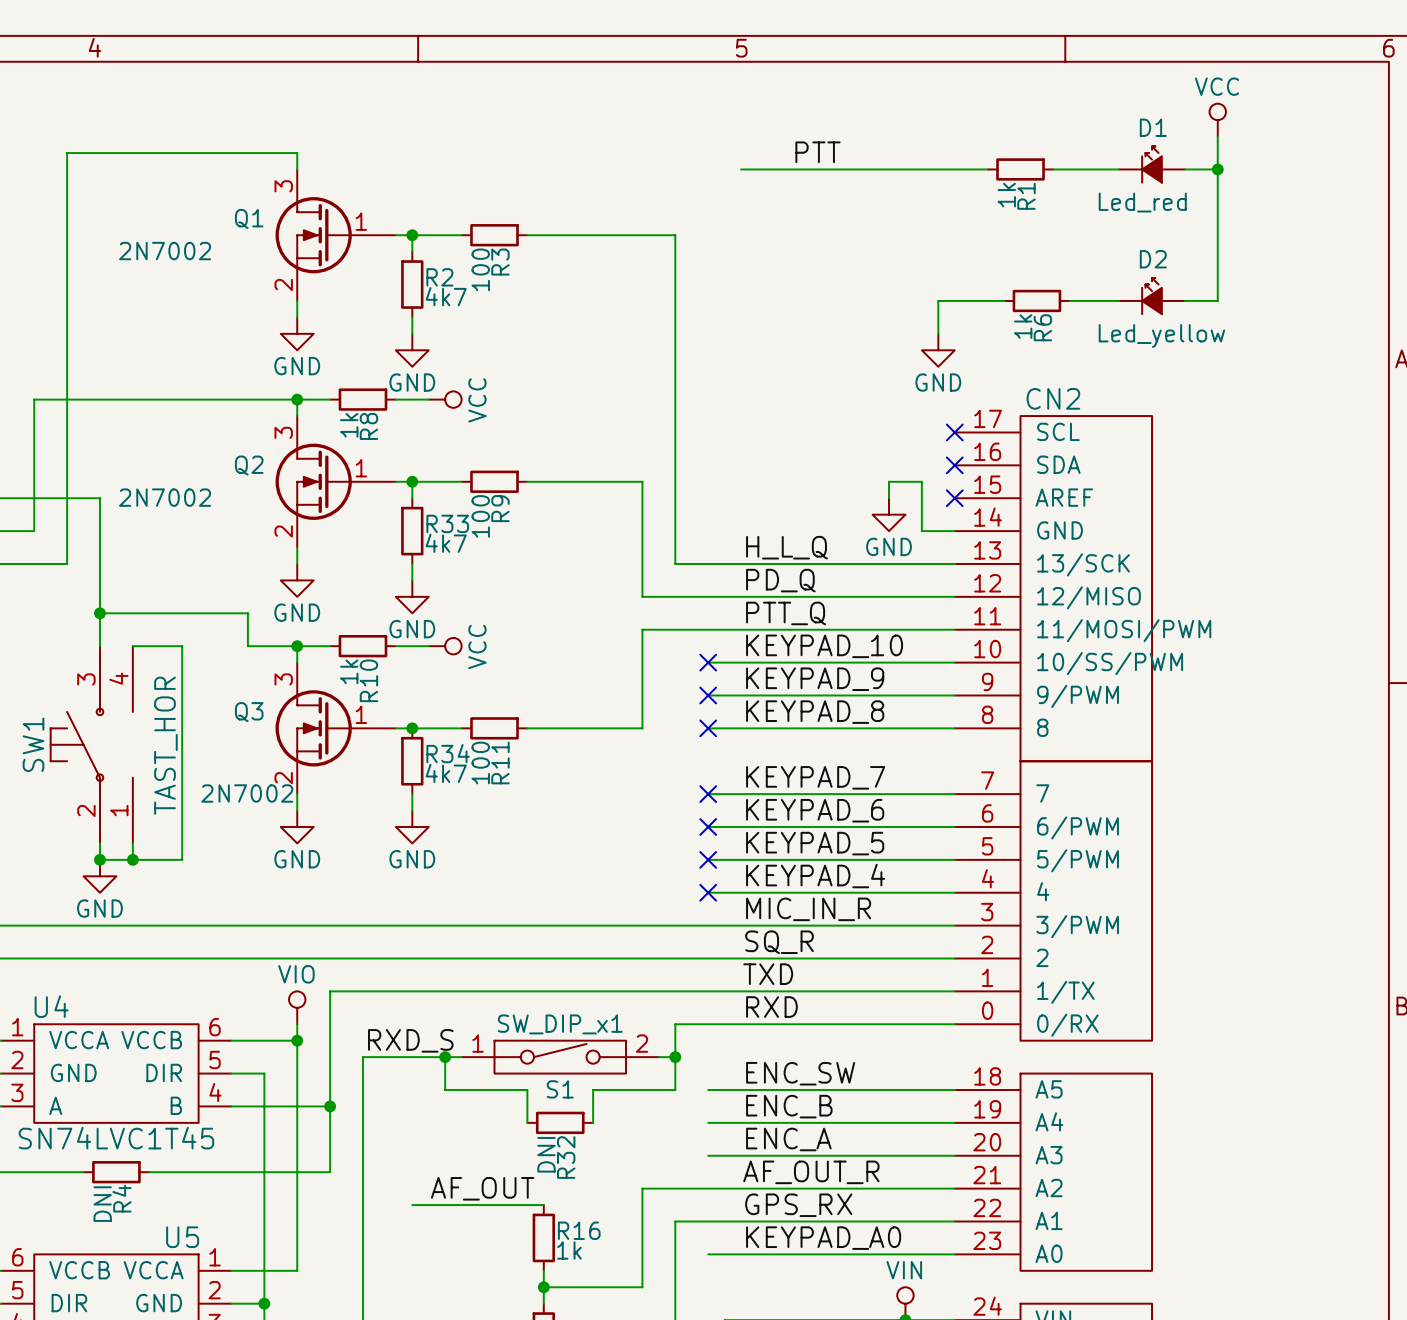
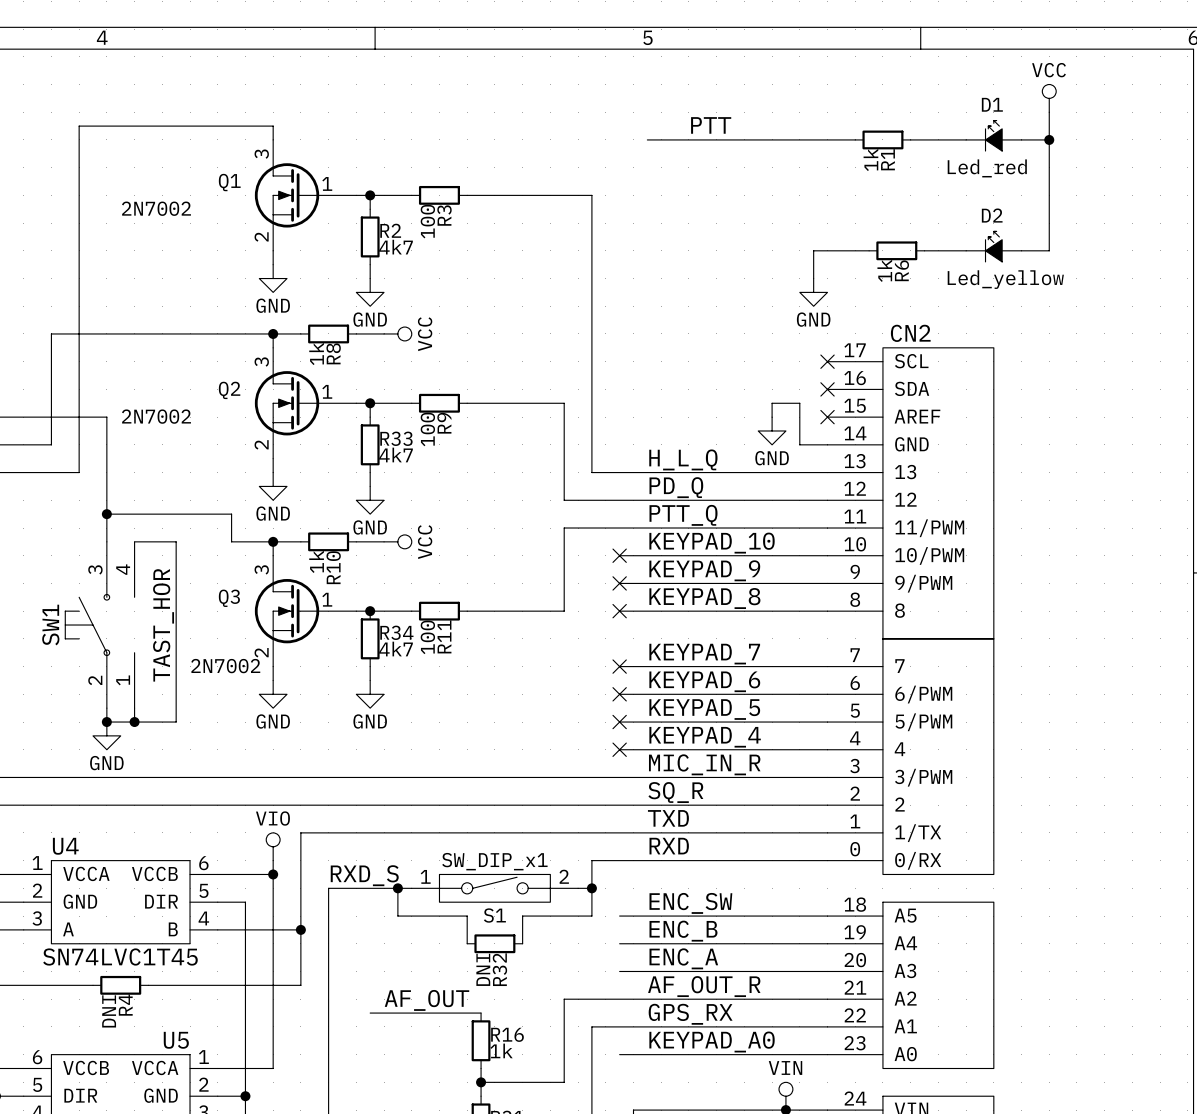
CN2 pin name: 13/SCK (1083, 564) -> 13 (905, 472)
CN2 pin name: 12/MISO (1088, 597) -> 12 (905, 499)
CN2 pin name: 11/MOSI/PWM (1124, 630) -> 11/PWM (929, 528)
CN2 pin name: 10/SS/PWM (1110, 663) -> 10/PWM (929, 555)

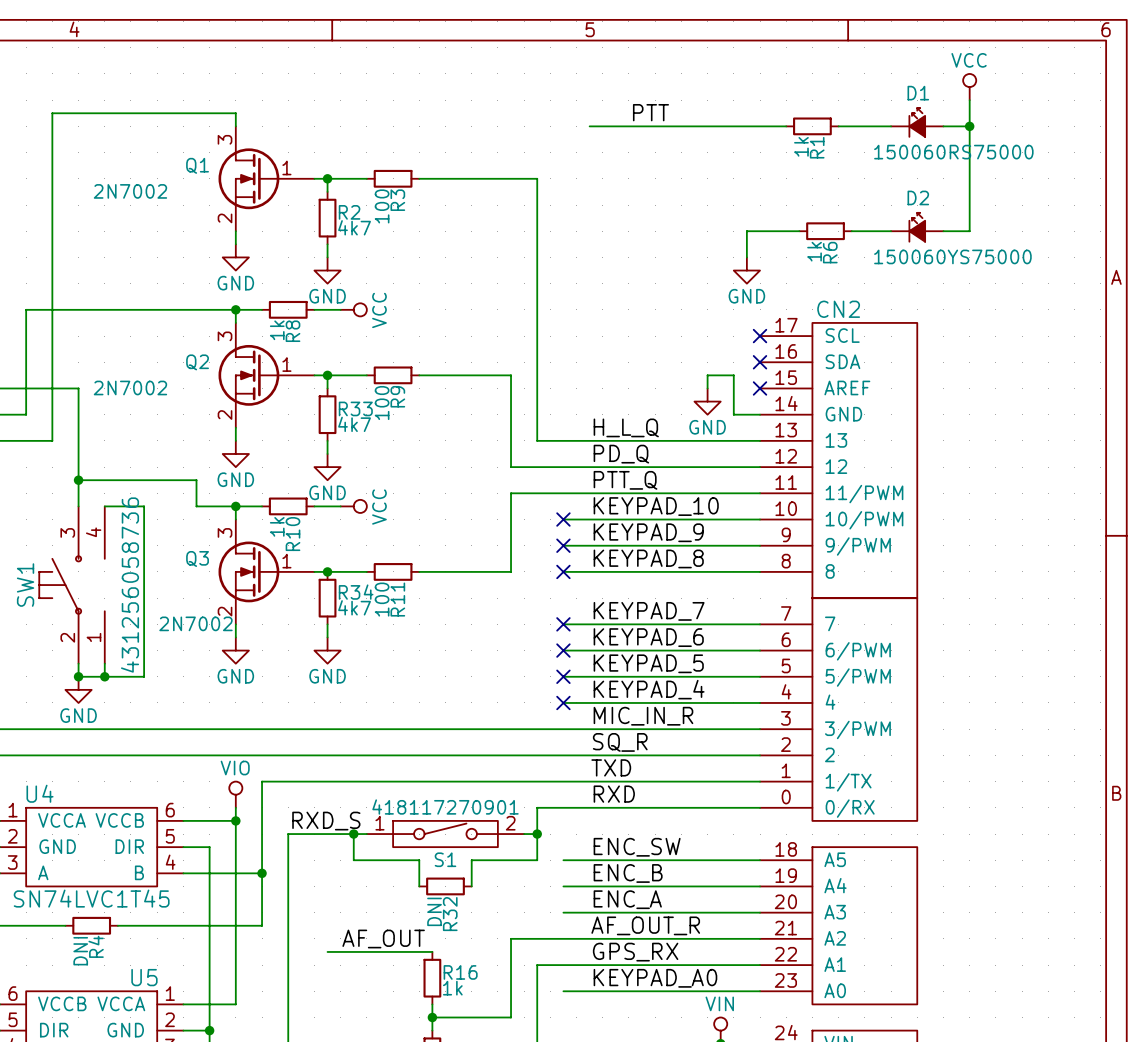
D1 value: Led_red (987, 168) -> 150060RS75000 (953, 152)
D2 value: Led_yellow (1005, 279) -> 150060YS75000 (952, 256)
SW1 value: TAST_HOR (163, 625) -> 431256058736 (130, 585)
S1 value: SW_DIP_x1 (494, 861) -> 418117270901 (445, 807)

